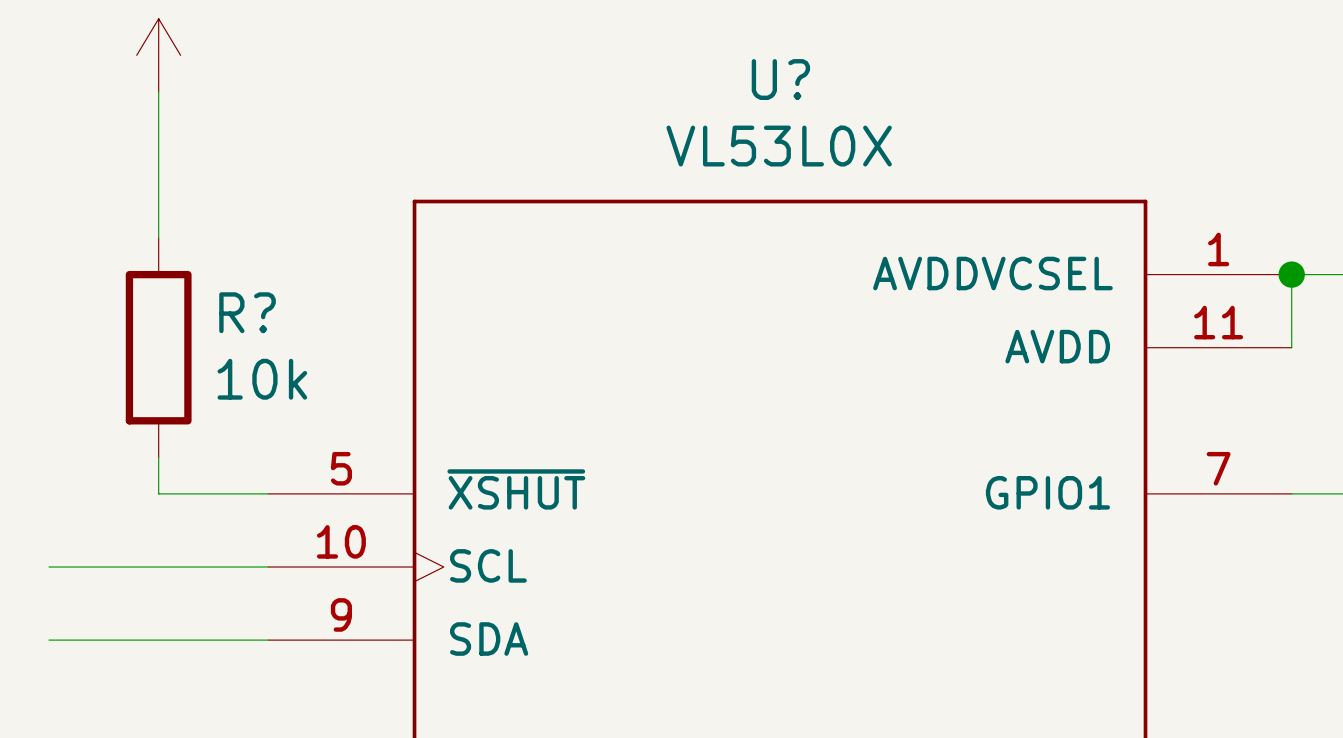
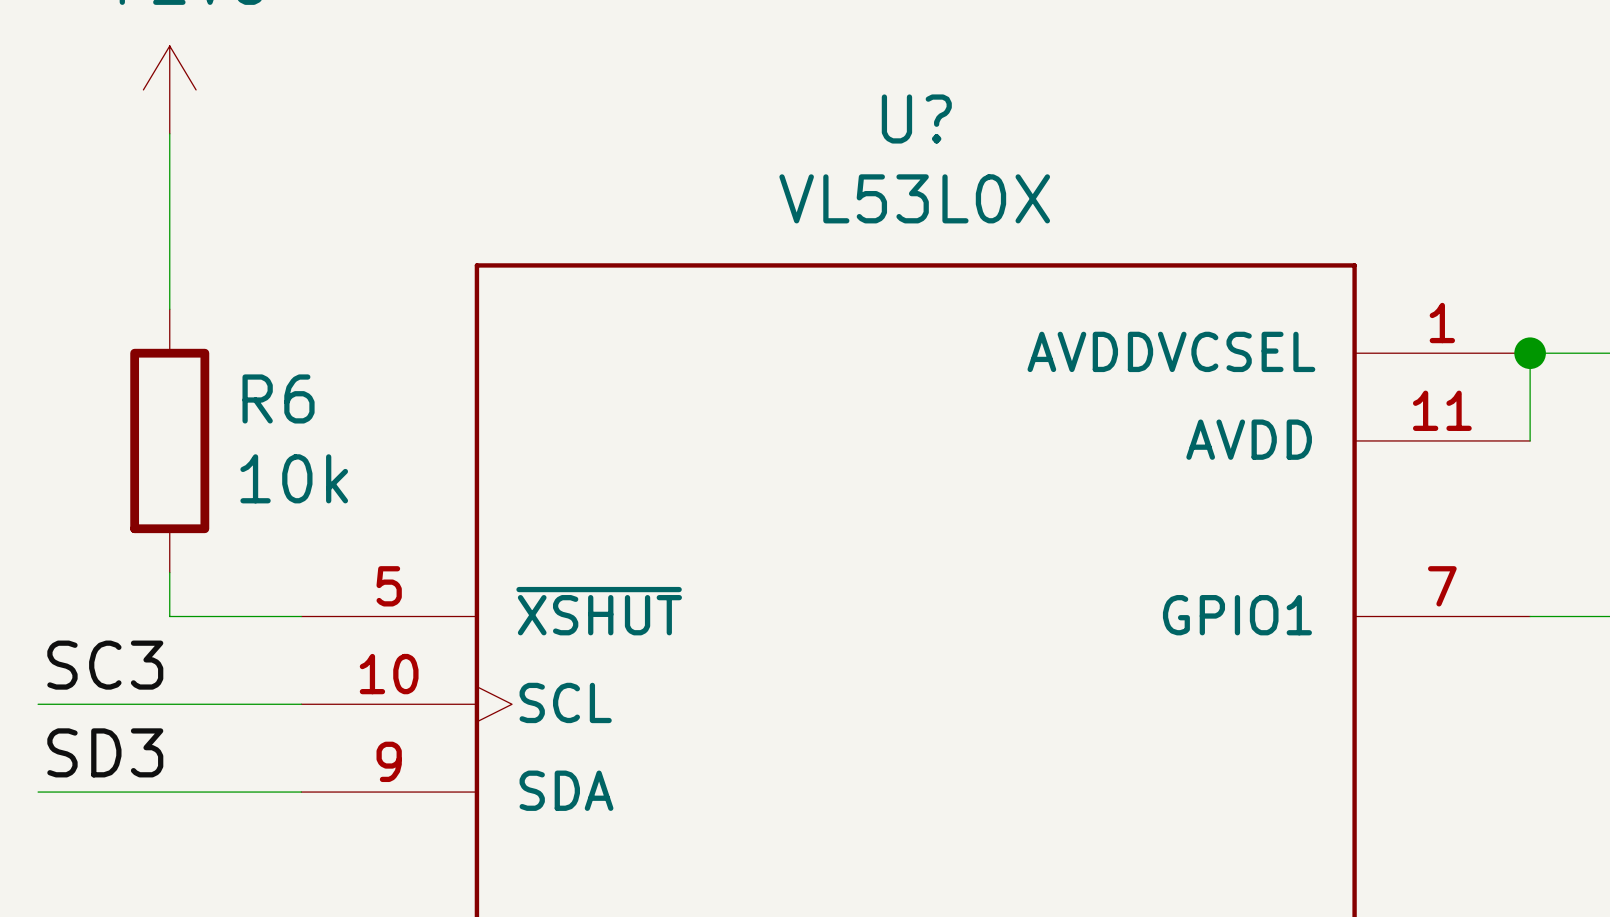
R? name: R? (247, 312) -> R6 (278, 398)
label: none -> SC3 (105, 665)
label: none -> SD3 (105, 752)

